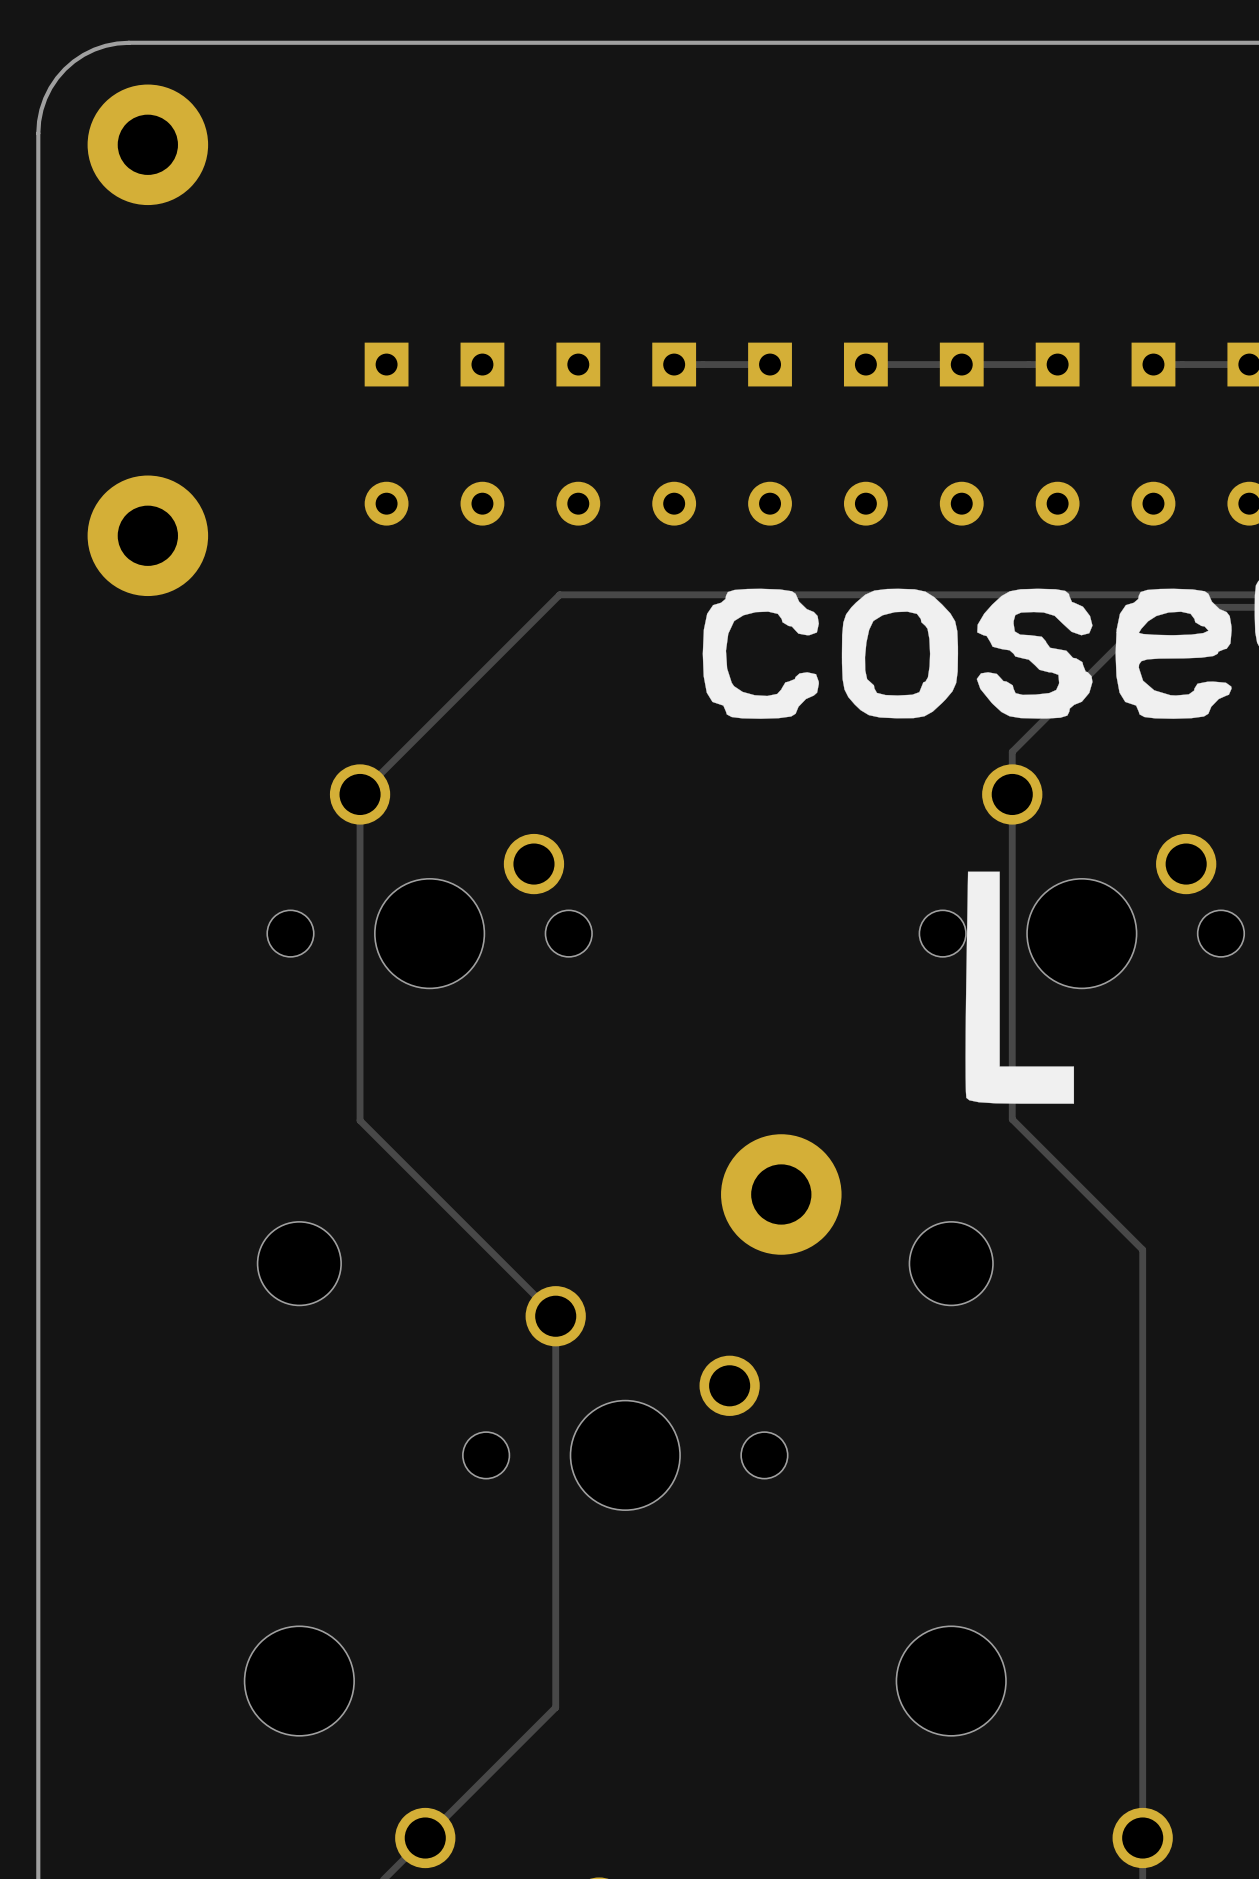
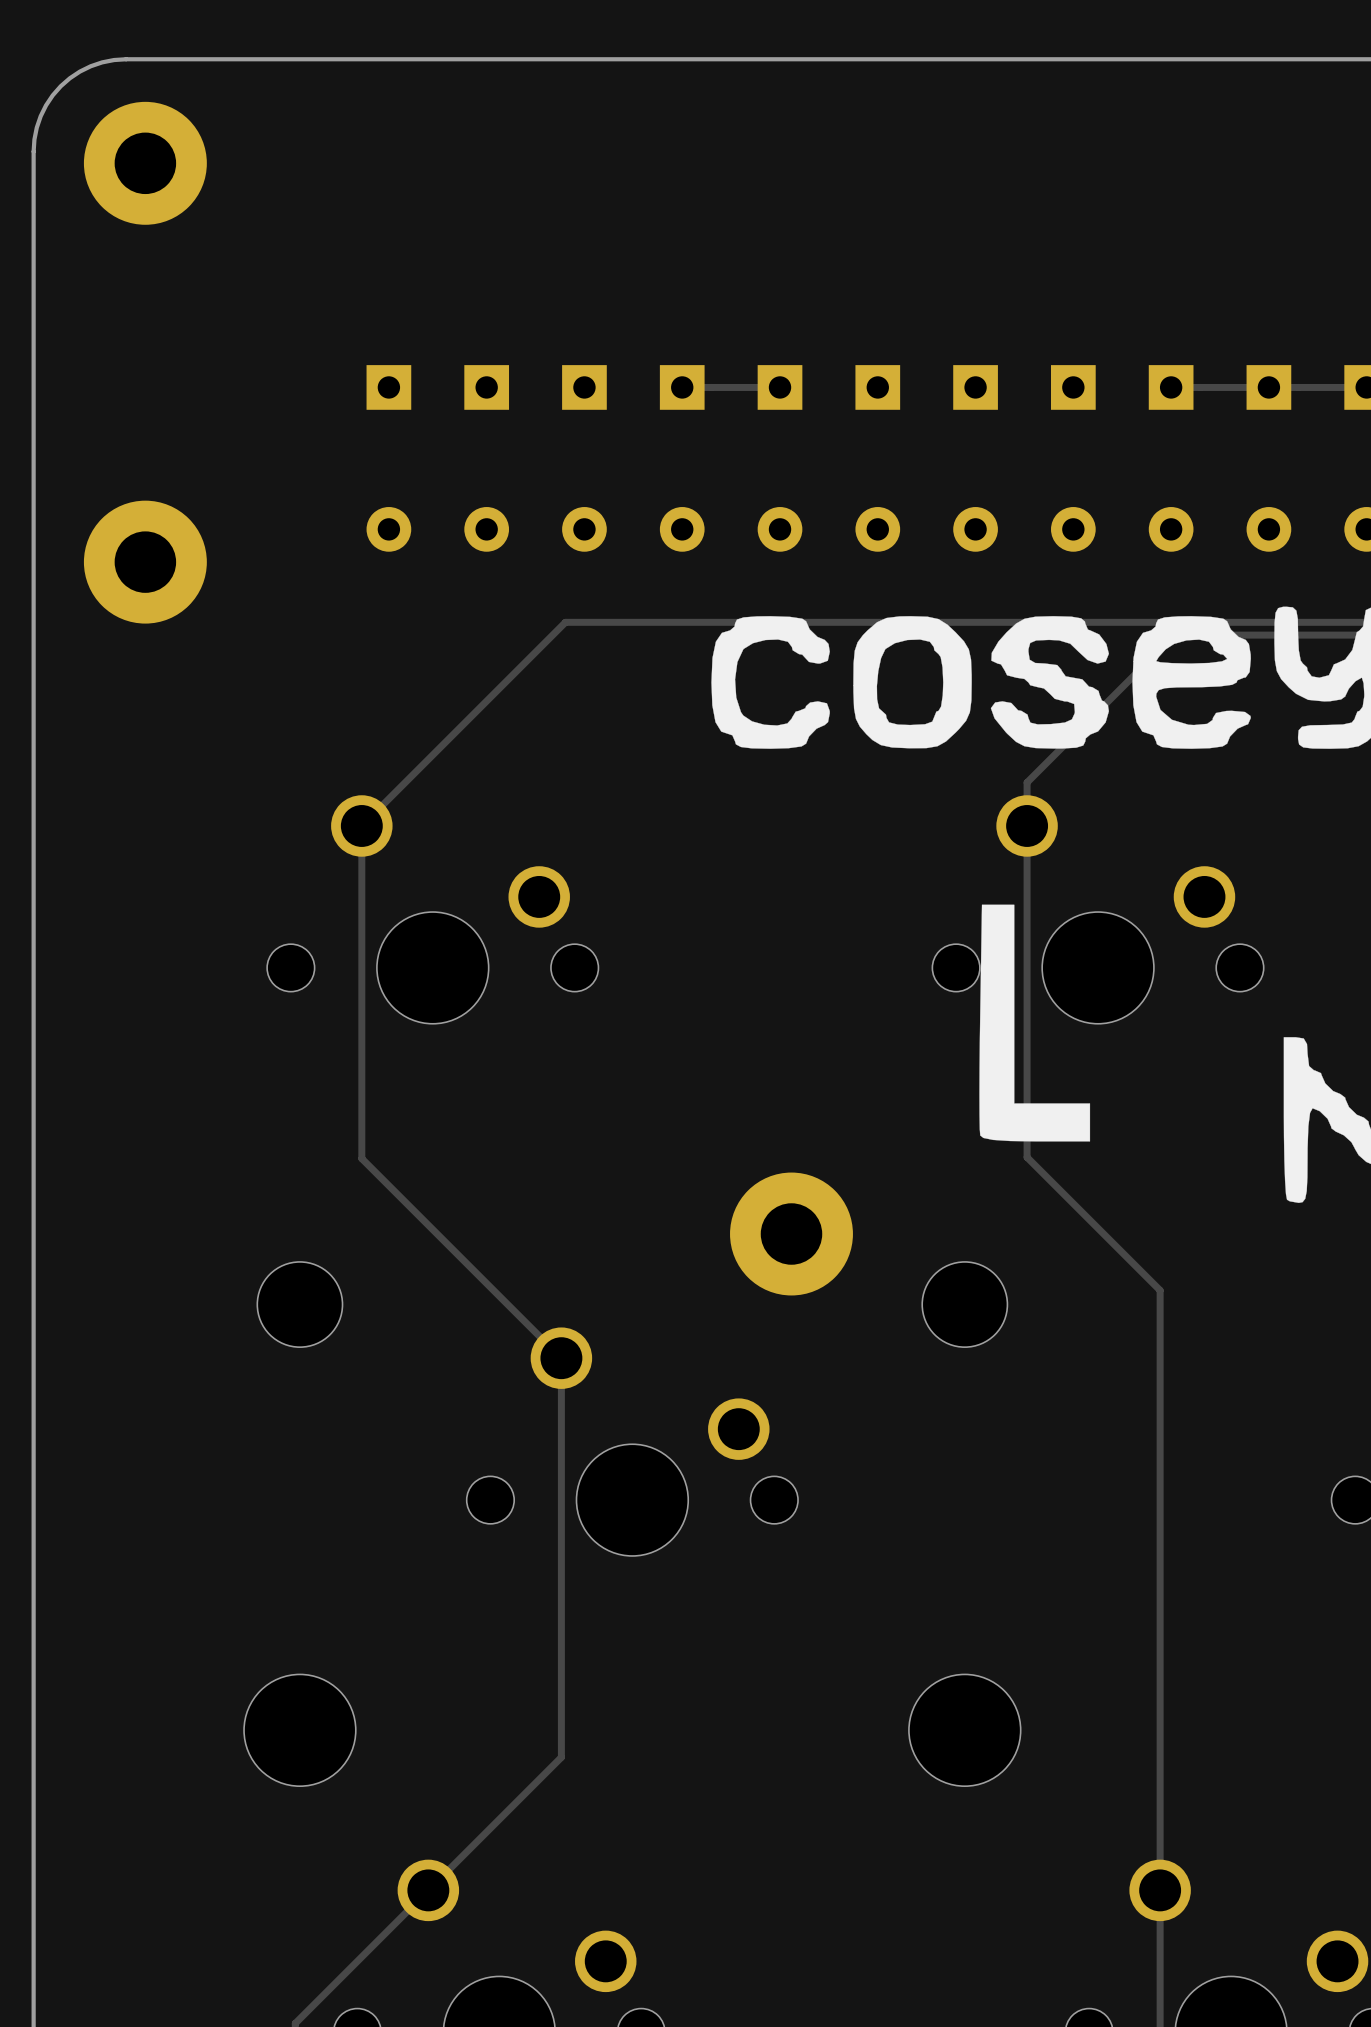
track: (1057, 364) (865, 364) -> none

